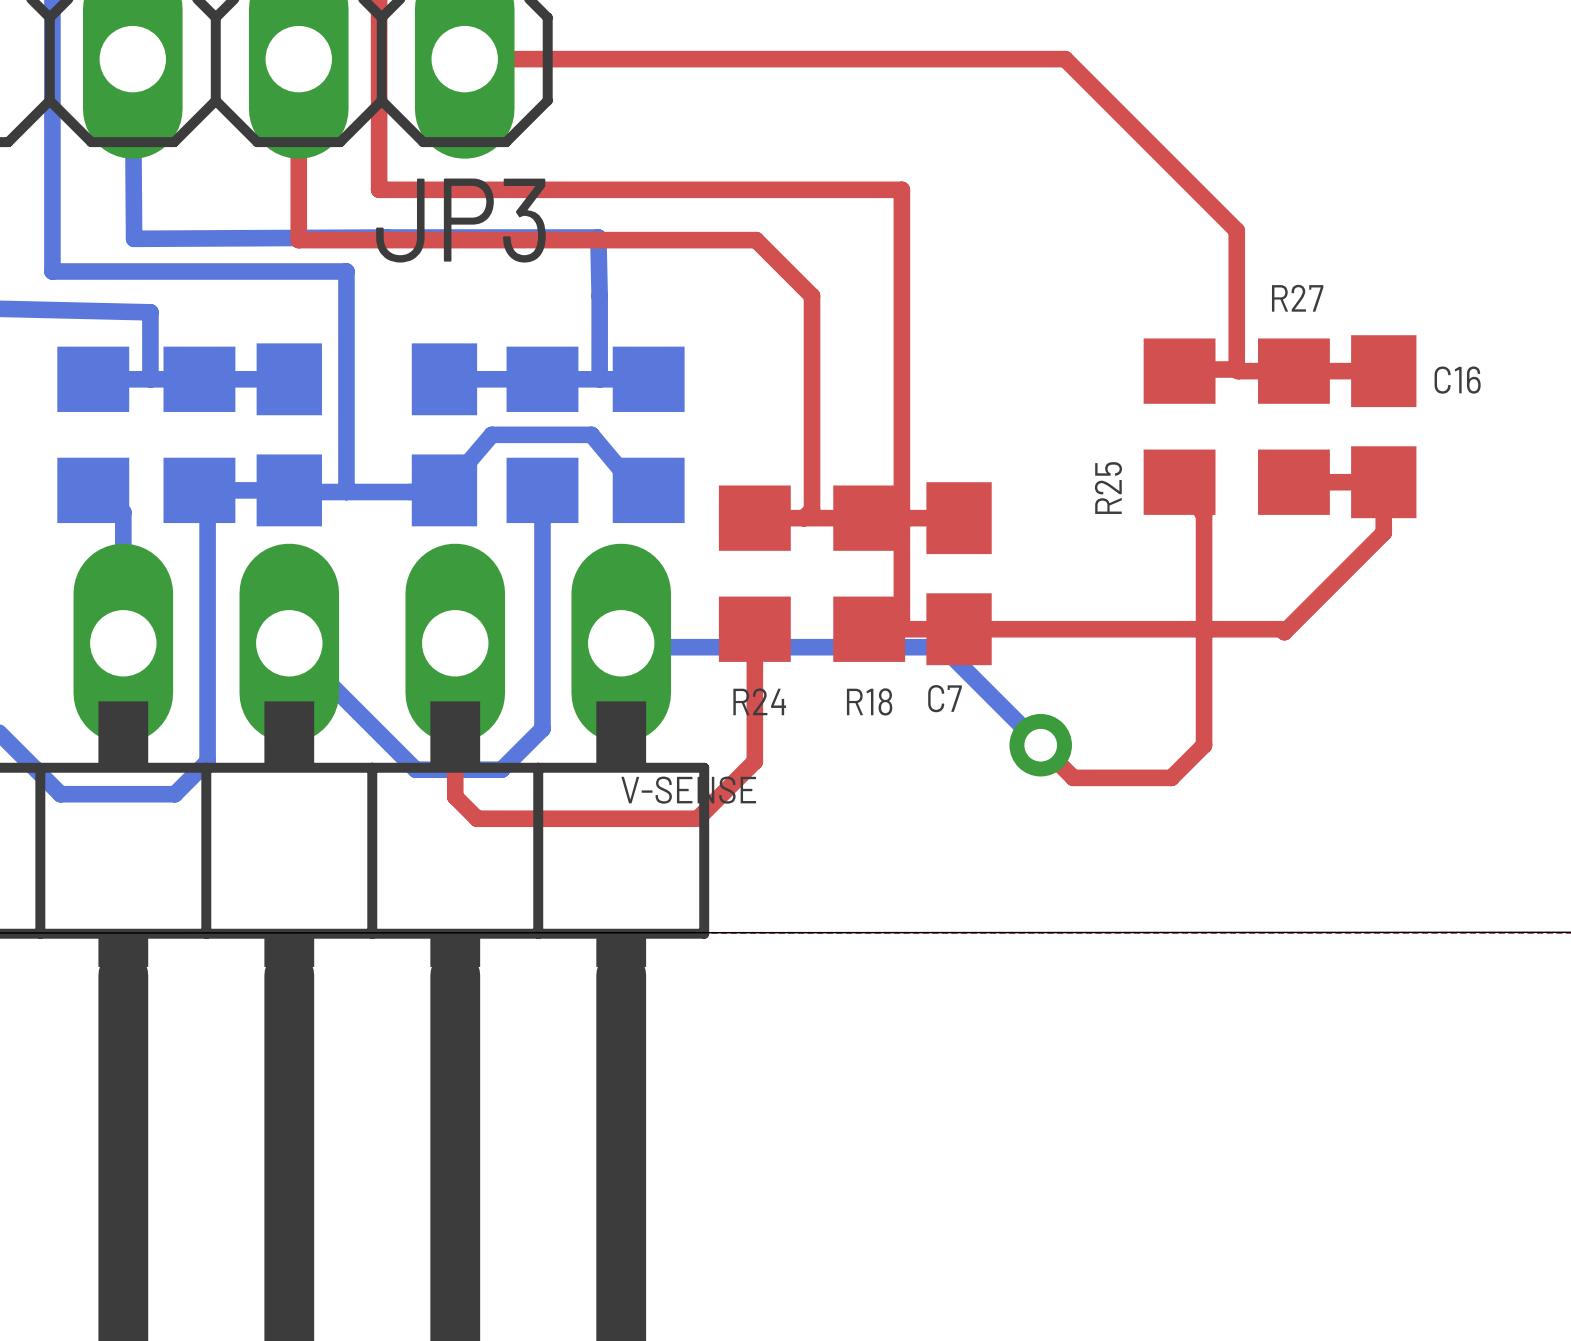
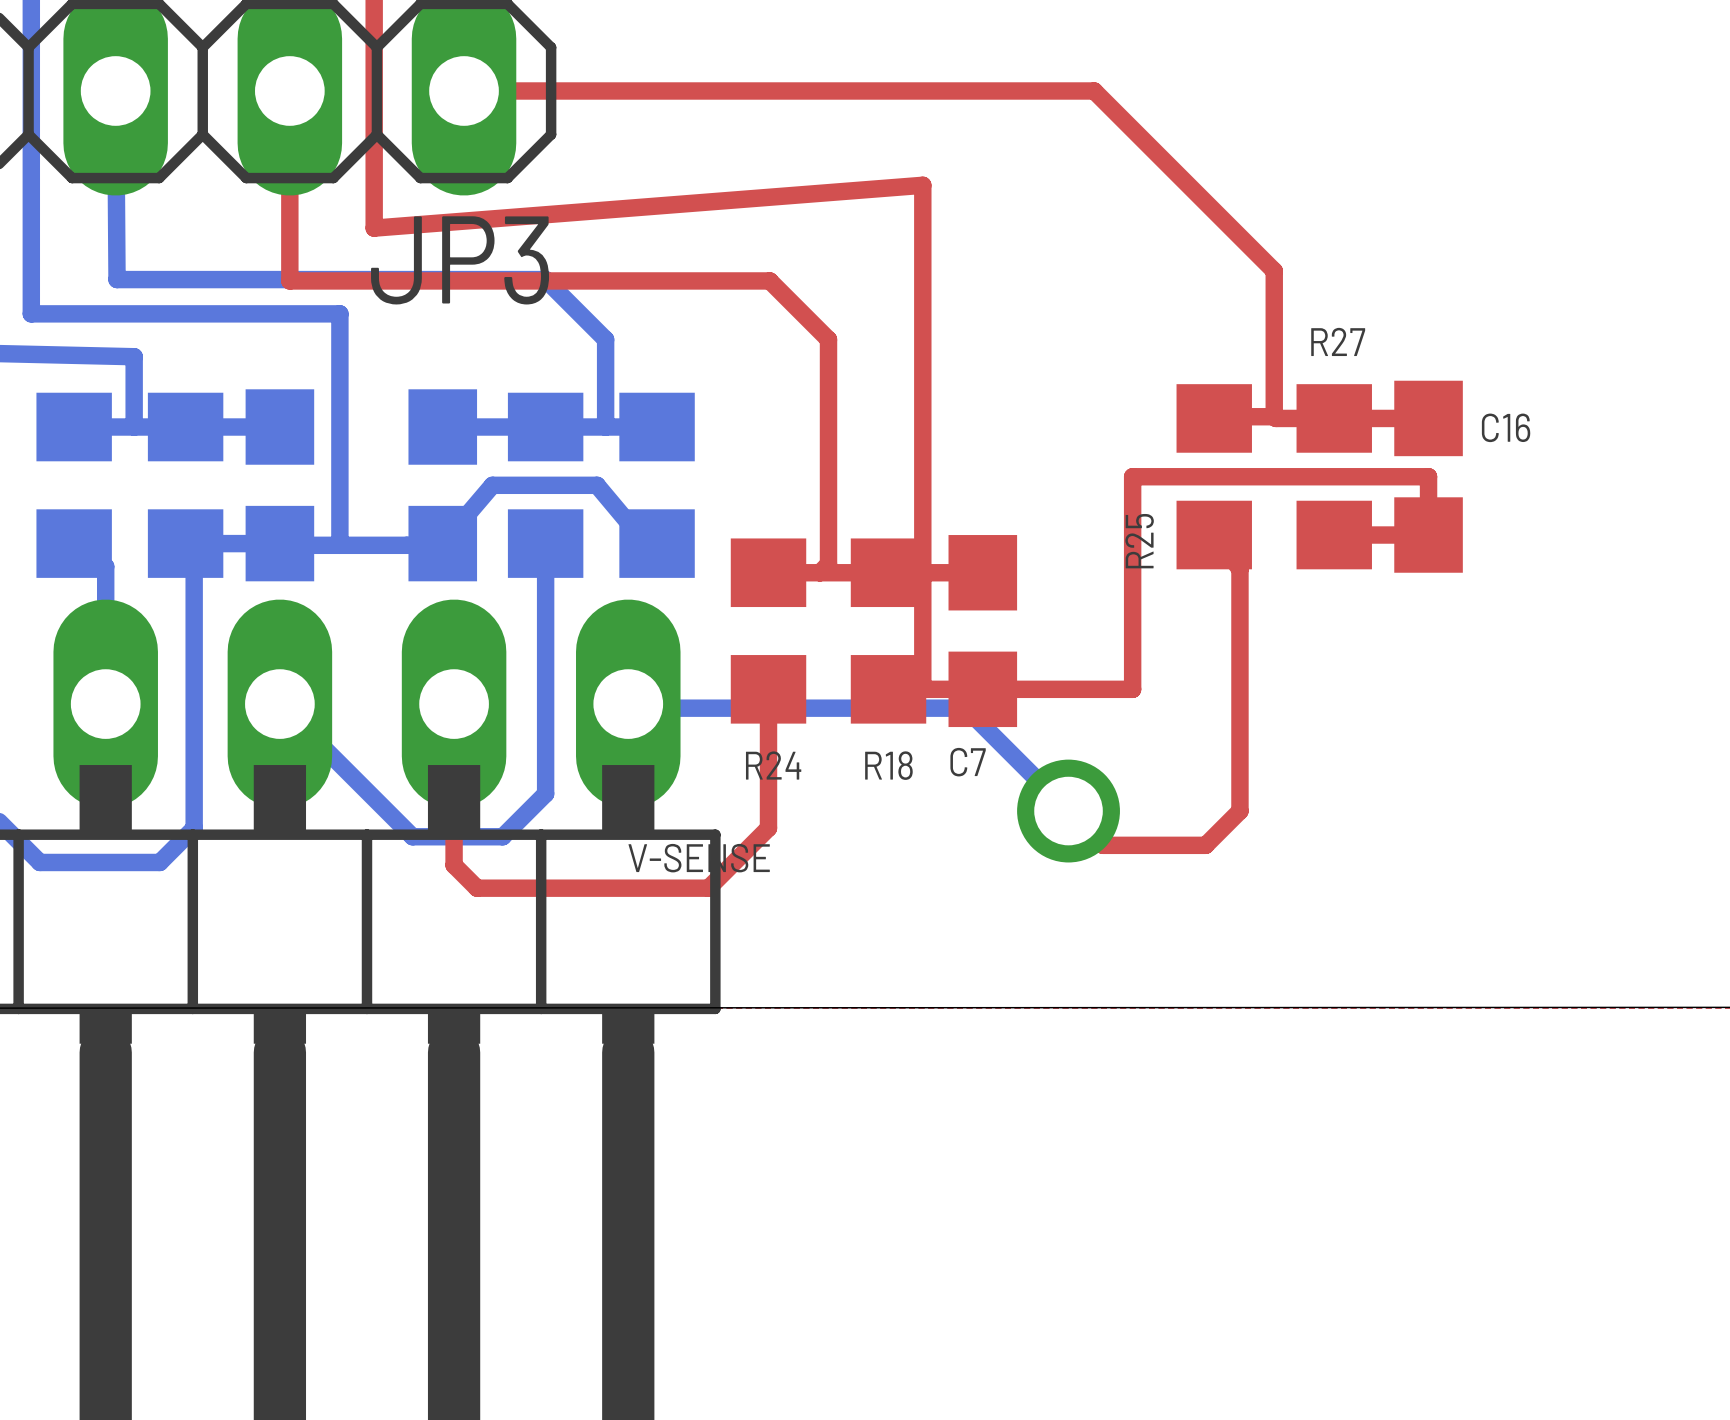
top track: (379, 189) (901, 189) -> (374, 228) (922, 185) (922, 228)
bottom track: (134, 238) (598, 237) (599, 295) -> (117, 279) (545, 279) (605, 339)
top track: (1383, 482) (1383, 532) (1284, 632) (1281, 629) (1101, 629) -> (1428, 535) (1428, 476) (1132, 476) (1132, 689)
via size: [1009, 713, 1072, 777] -> [1017, 759, 1120, 863]

